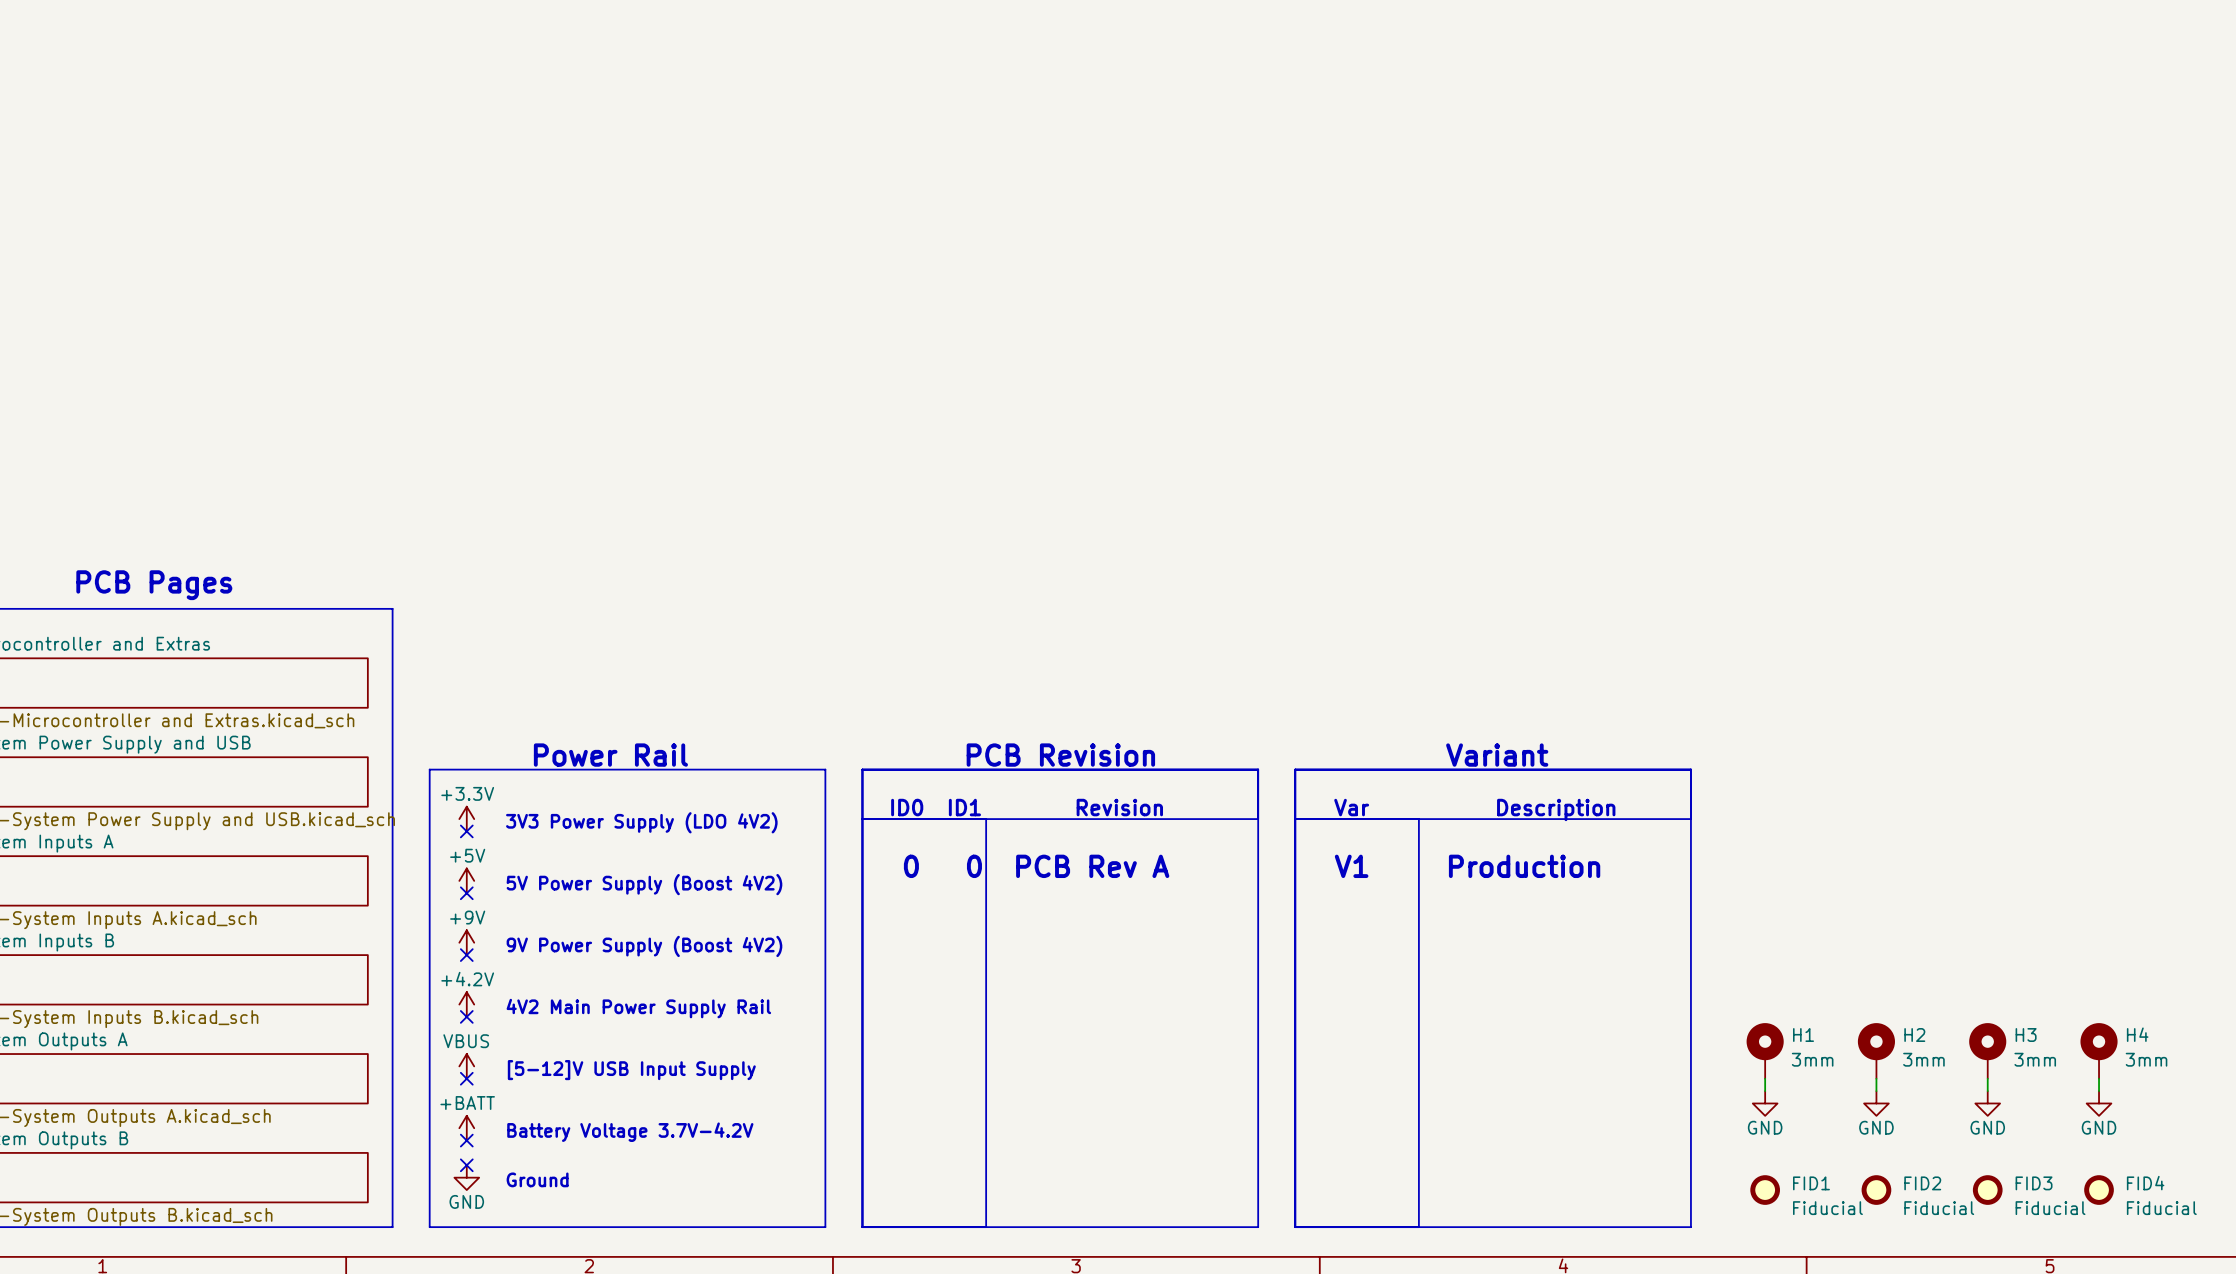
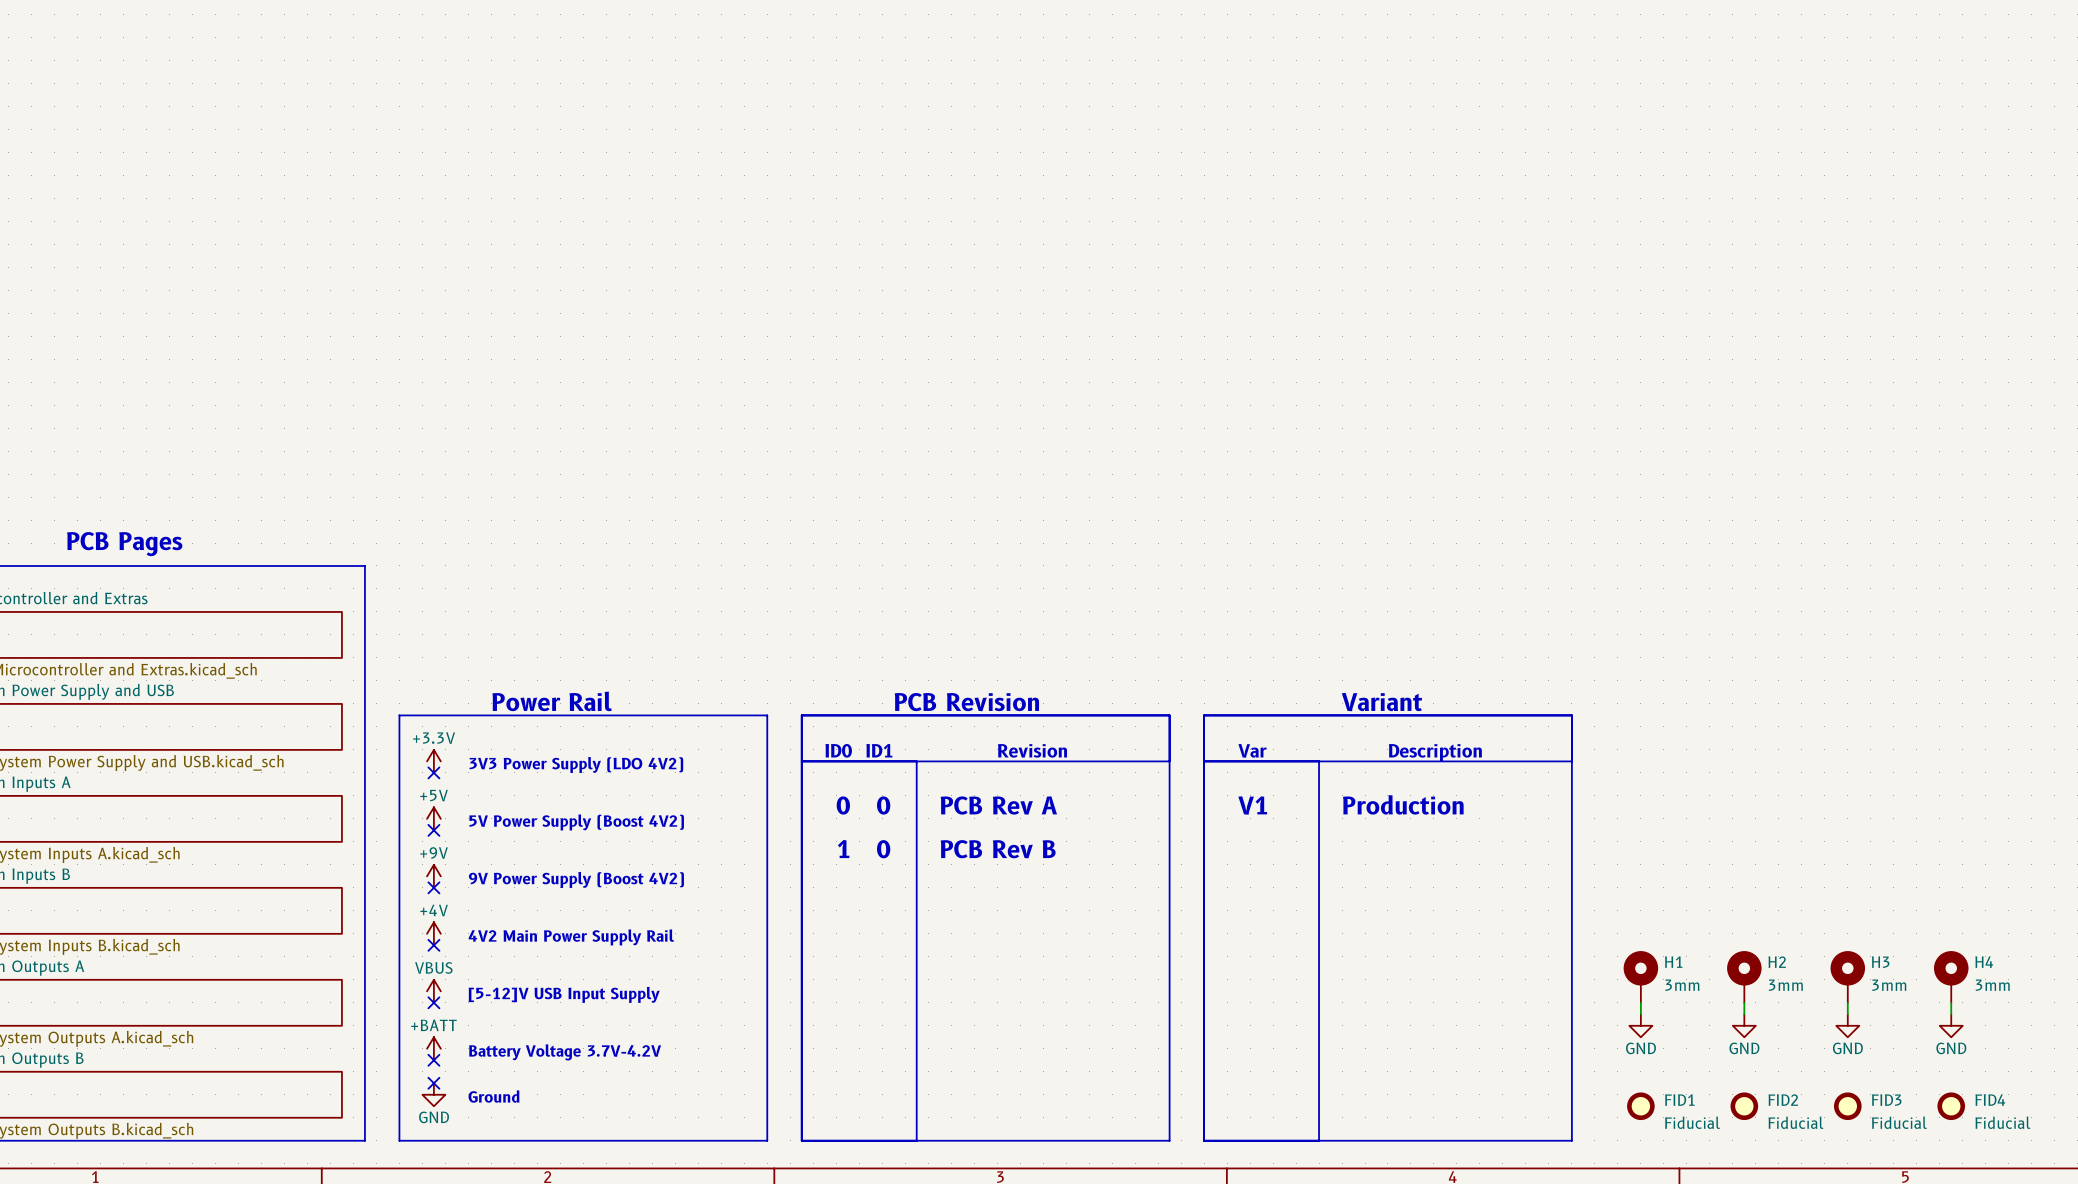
text: none -> 1 0 (864, 849)
text: none -> PCB Rev B (998, 849)
power symbol: +4.2V (466, 1004) -> +4V (433, 933)

